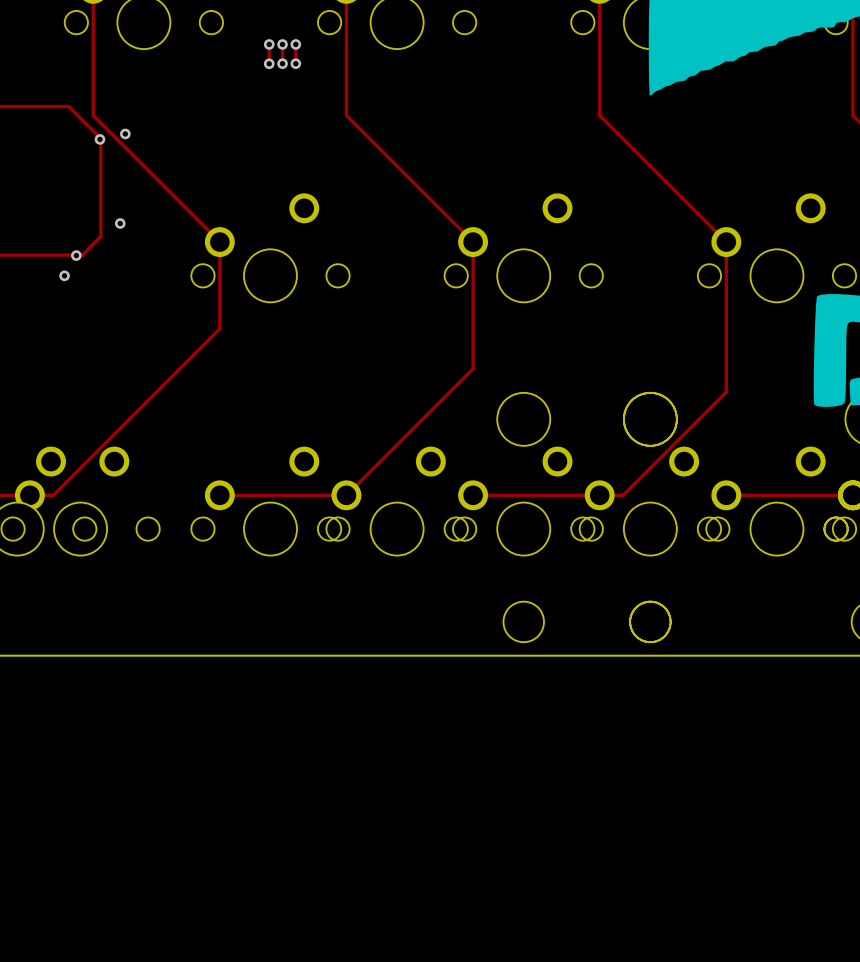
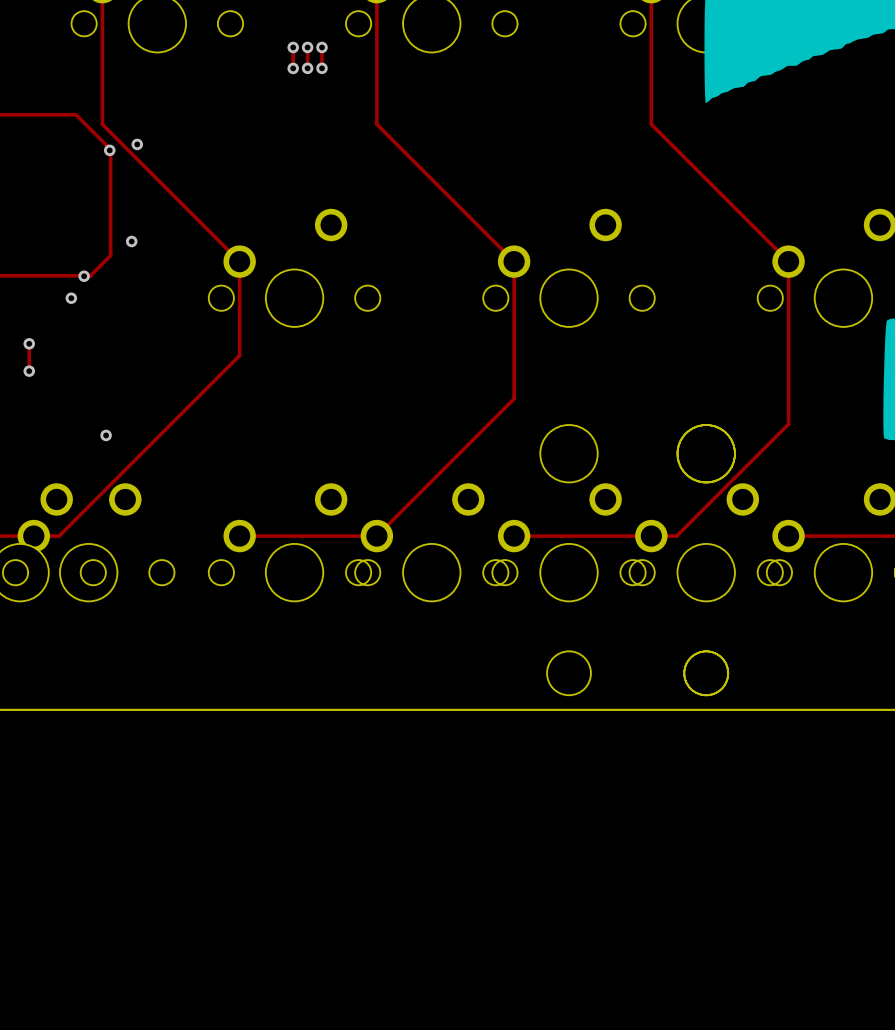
track: none -> (29, 343) (29, 371)
via: none -> (29, 343)
via: none -> (29, 371)
via: none -> (106, 435)

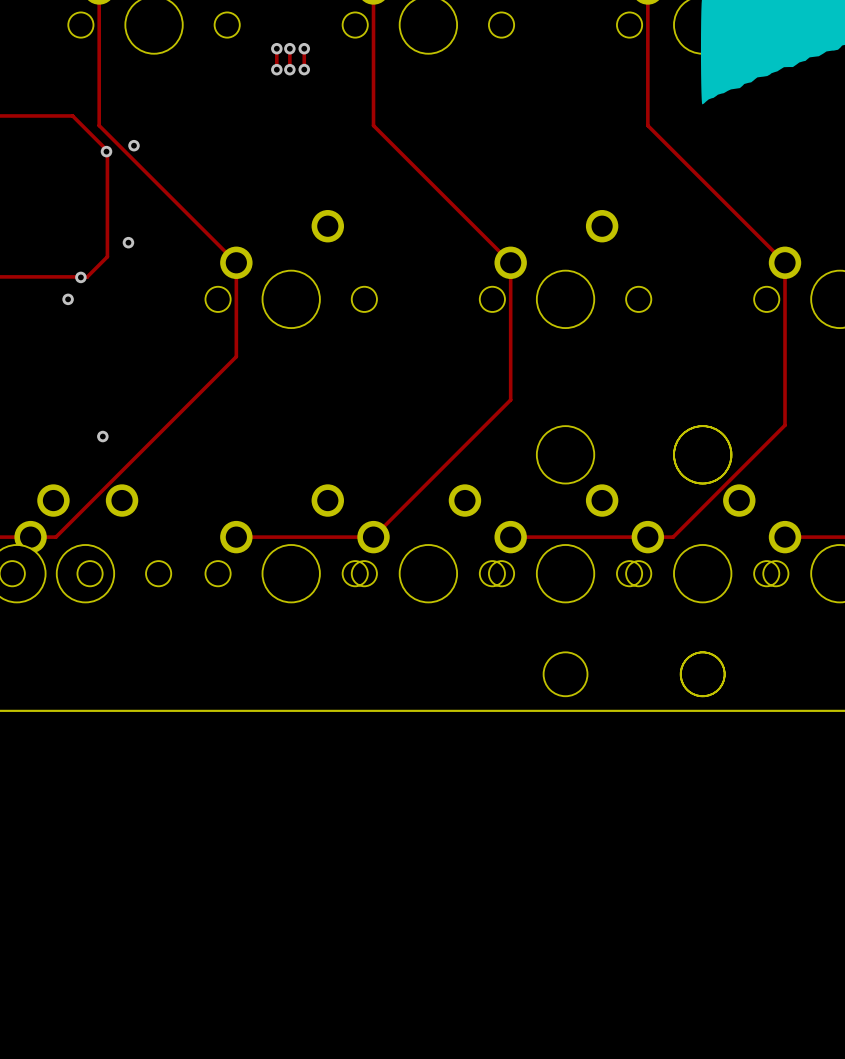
via: none -> (276, 48)
track: (322, 47) (322, 68) -> (276, 48) (276, 69)
via: (322, 47) -> none
via: none -> (276, 69)
via: (322, 68) -> none
track: (29, 343) (29, 371) -> none
via: (29, 343) -> none
via: (29, 371) -> none

